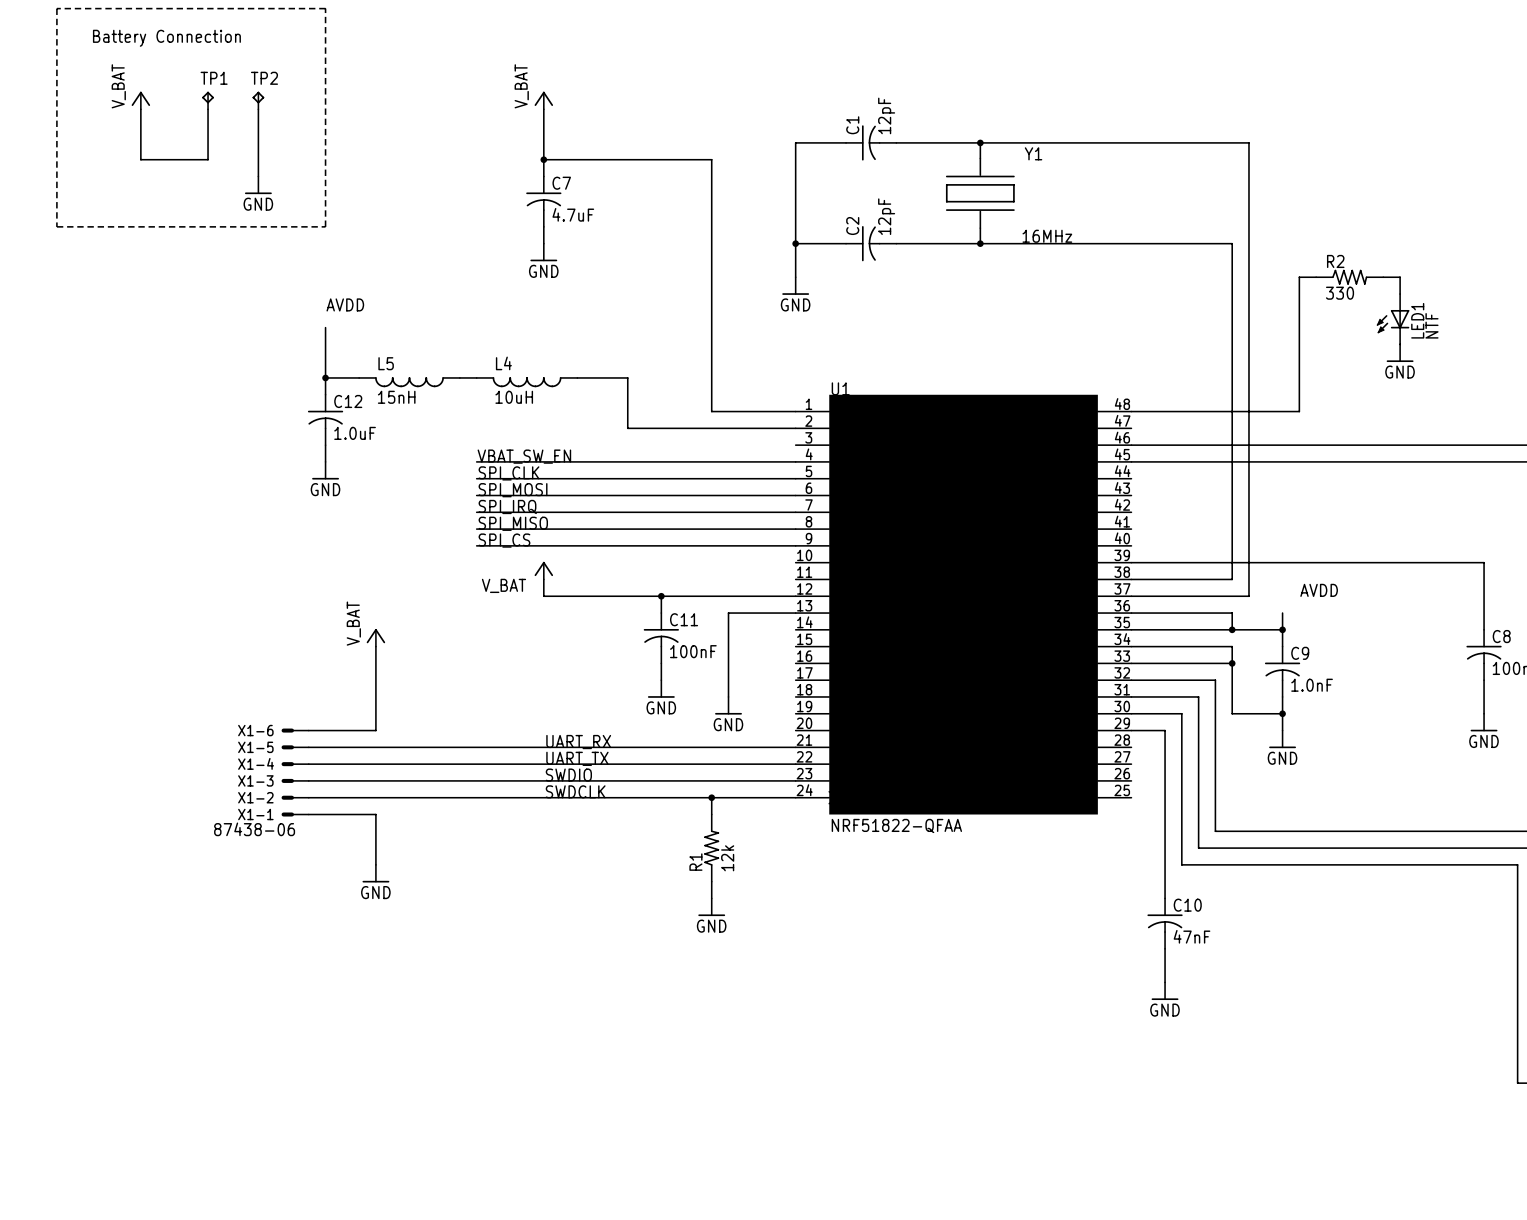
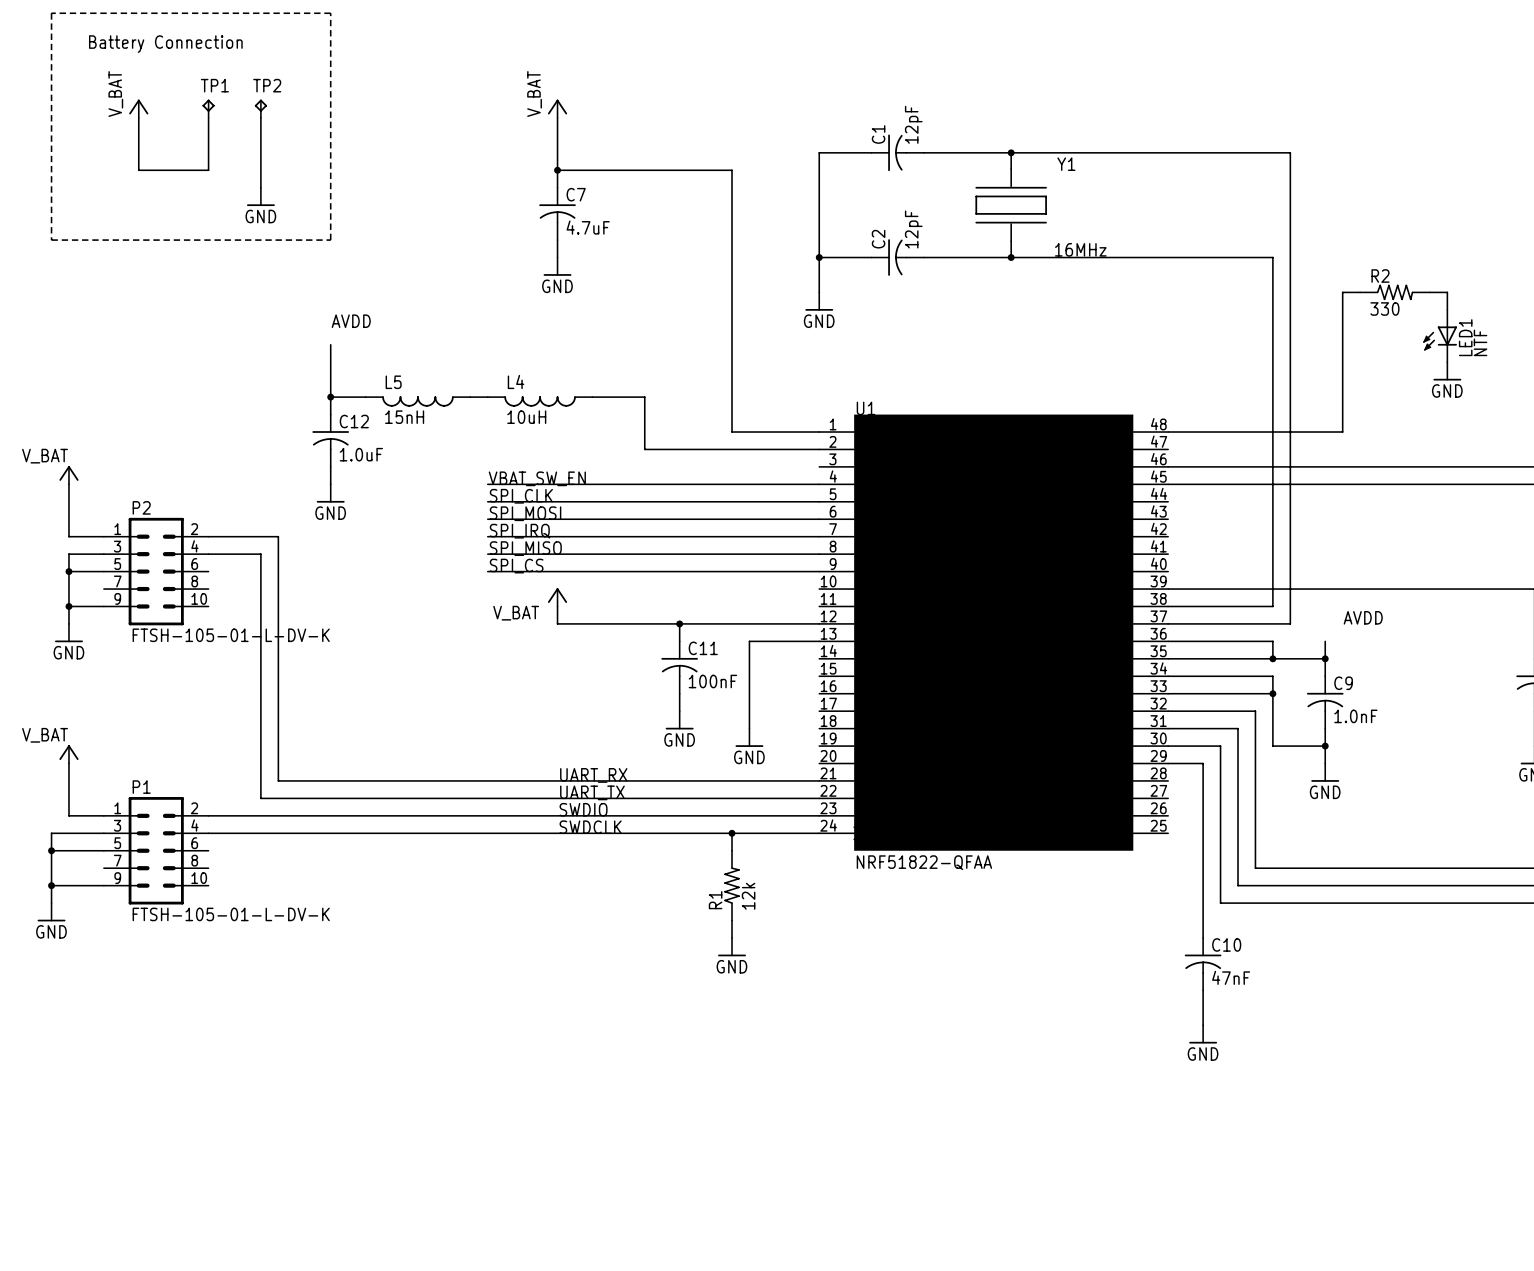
power symbol: none -> V_BAT (68, 475)
wire: none -> (68, 484) (68, 536) (103, 536)
wire: none -> (208, 536) (278, 536) (278, 780) (313, 780)
wire: none -> (103, 554) (68, 554) (68, 623)
wire: none -> (208, 554) (260, 554) (260, 798) (313, 798)
wire: none -> (68, 571) (103, 571)
junction: none -> (68, 571)
P2: none -> FTSH-105-01-L-DV-K (156, 571)
wire: none -> (68, 606) (103, 606)
junction: none -> (68, 606)
power symbol: none -> GND (68, 633)
power symbol: V_BAT (375, 637) -> none
wire: (375, 646) (375, 730) (308, 730) -> none
power symbol: none -> V_BAT (68, 754)
wire: none -> (68, 763) (68, 815) (103, 815)
X1-6: (295, 730) -> none
X1-5: (295, 747) -> none
X1-4: (295, 764) -> none
wire: none -> (208, 815) (313, 815)
X1-3: (295, 780) -> none
wire: none -> (103, 833) (51, 833) (51, 903)
wire: none -> (208, 833) (313, 833)
X1-2: (295, 797) -> none
wire: none -> (51, 850) (103, 850)
junction: none -> (51, 850)
P1: none -> FTSH-105-01-L-DV-K (156, 850)
X1-1: 87438-06 (295, 814) -> none
wire: (308, 814) (375, 814) (375, 864) -> none
wire: none -> (51, 885) (103, 885)
junction: none -> (51, 885)
power symbol: none -> GND (51, 912)
power symbol: GND (375, 873) -> none

